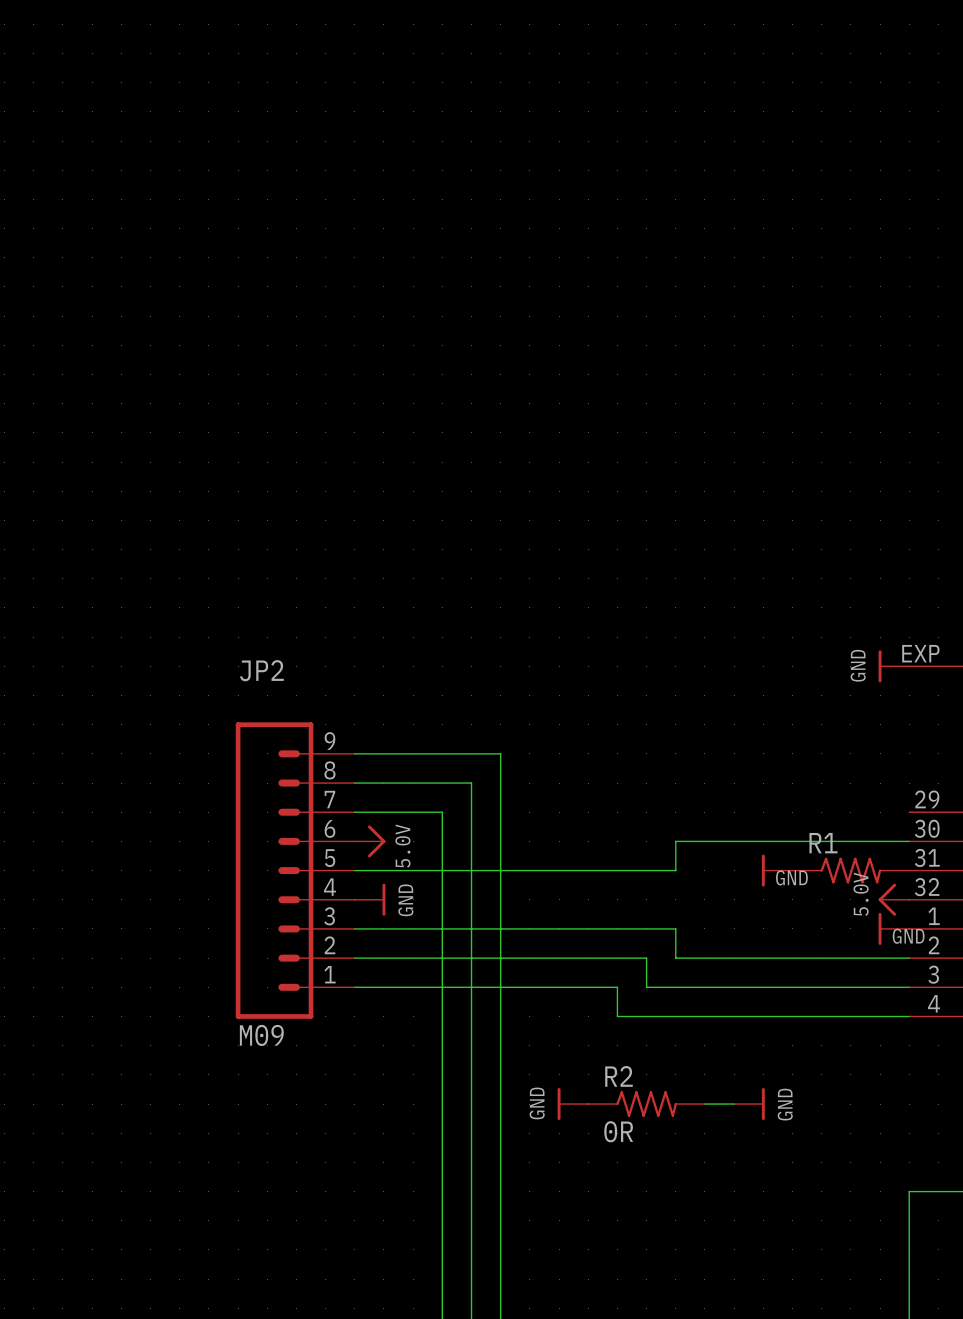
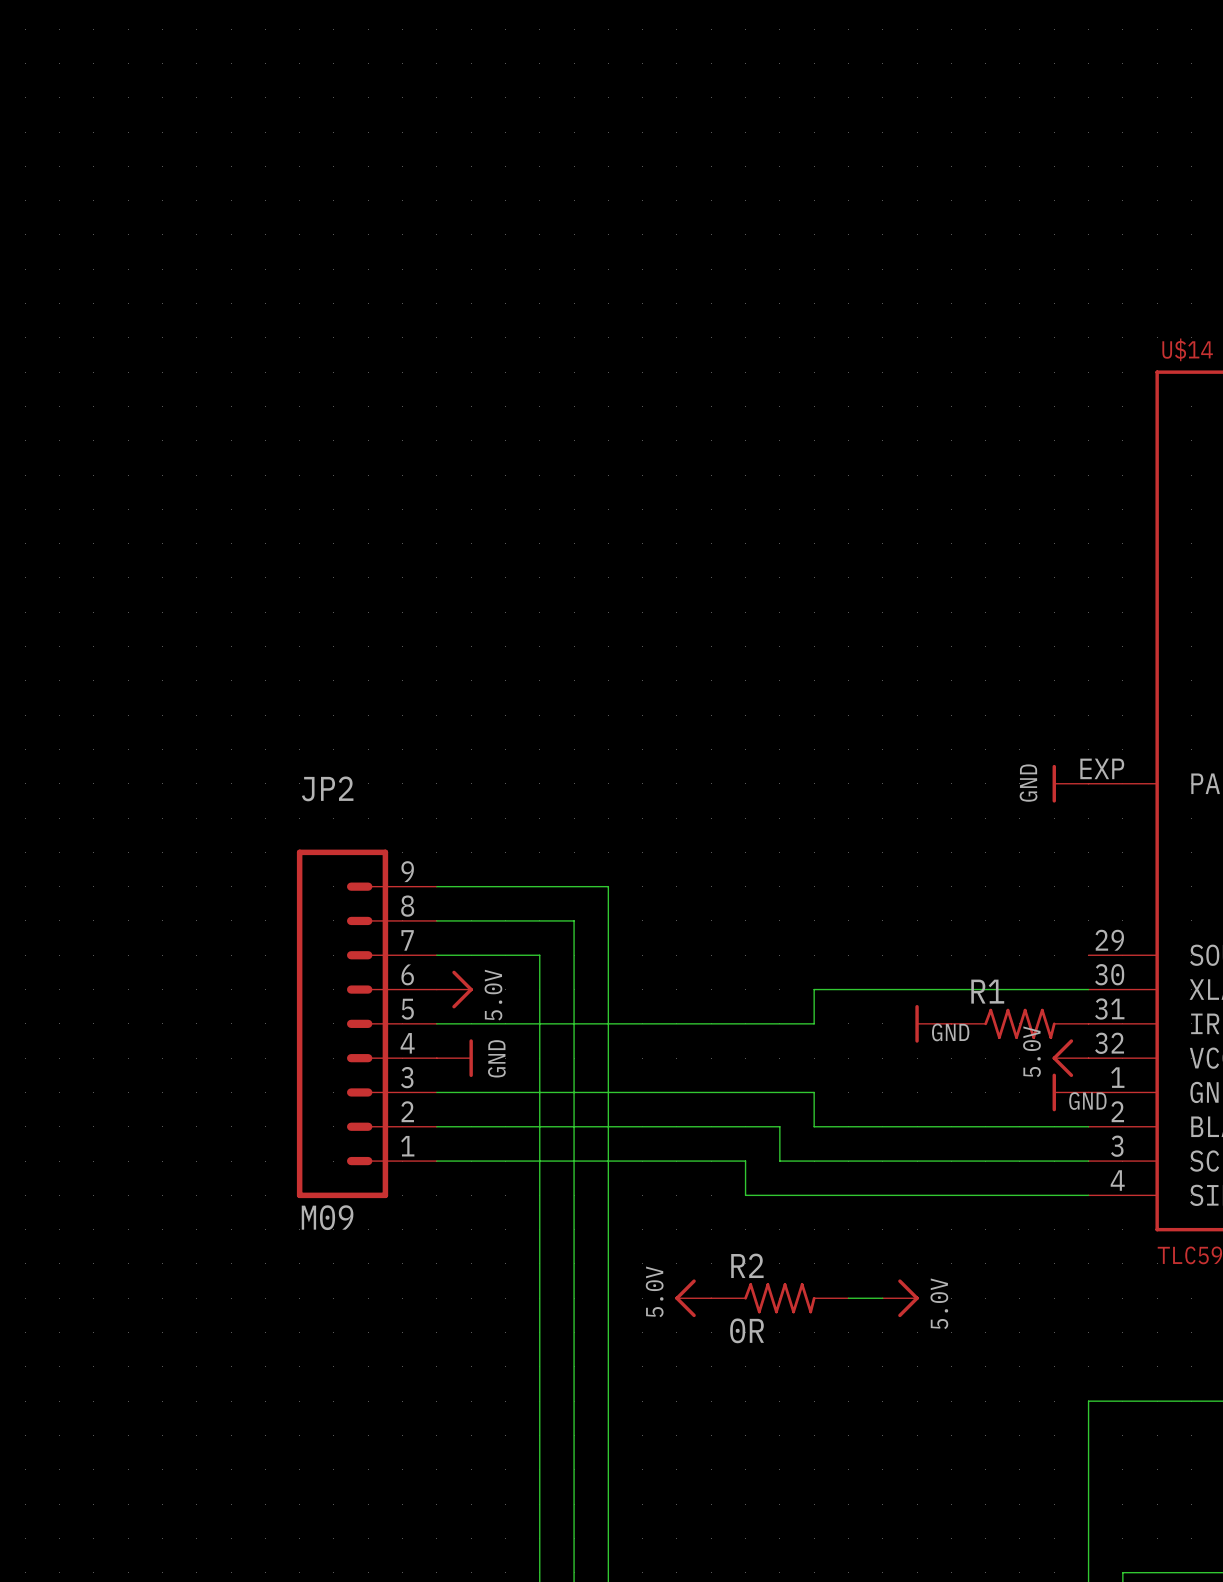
power symbol: GND (572, 1104) -> 5.0V (693, 1298)
power symbol: GND (749, 1104) -> 5.0V (900, 1298)

